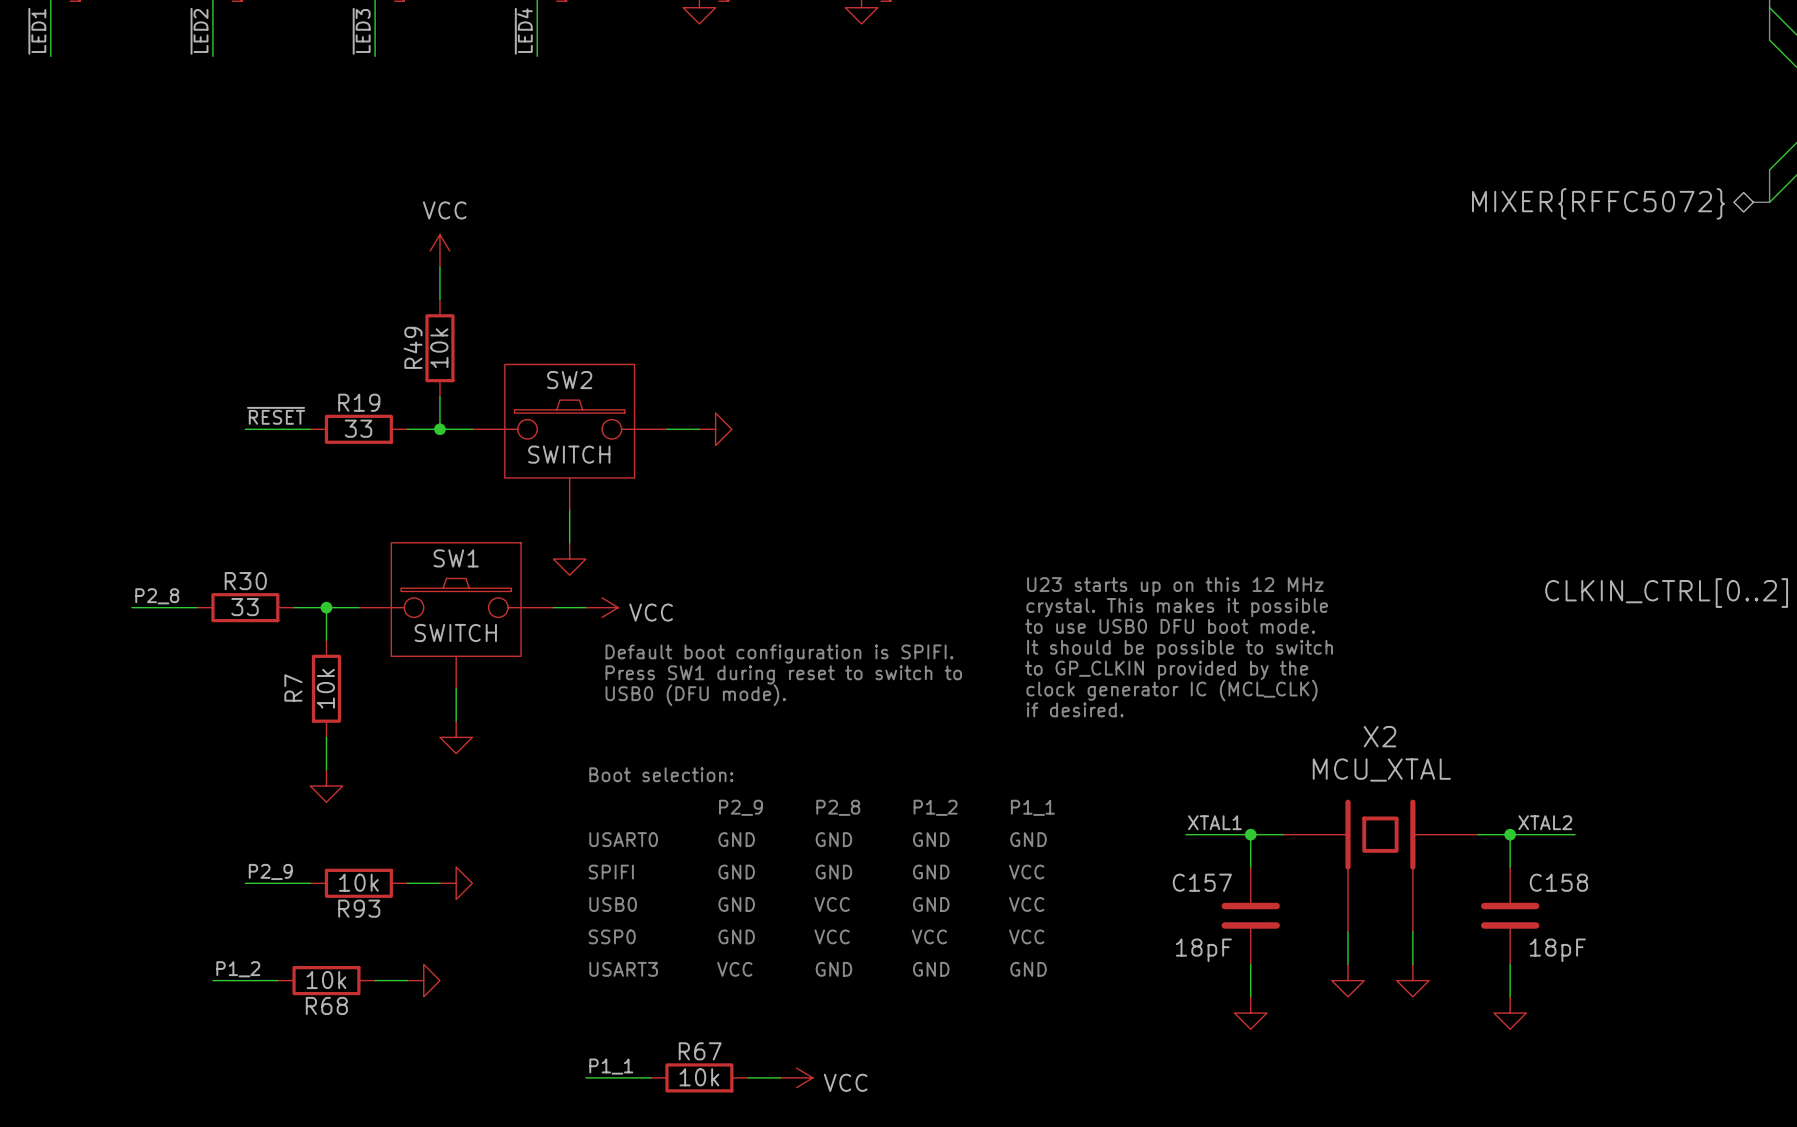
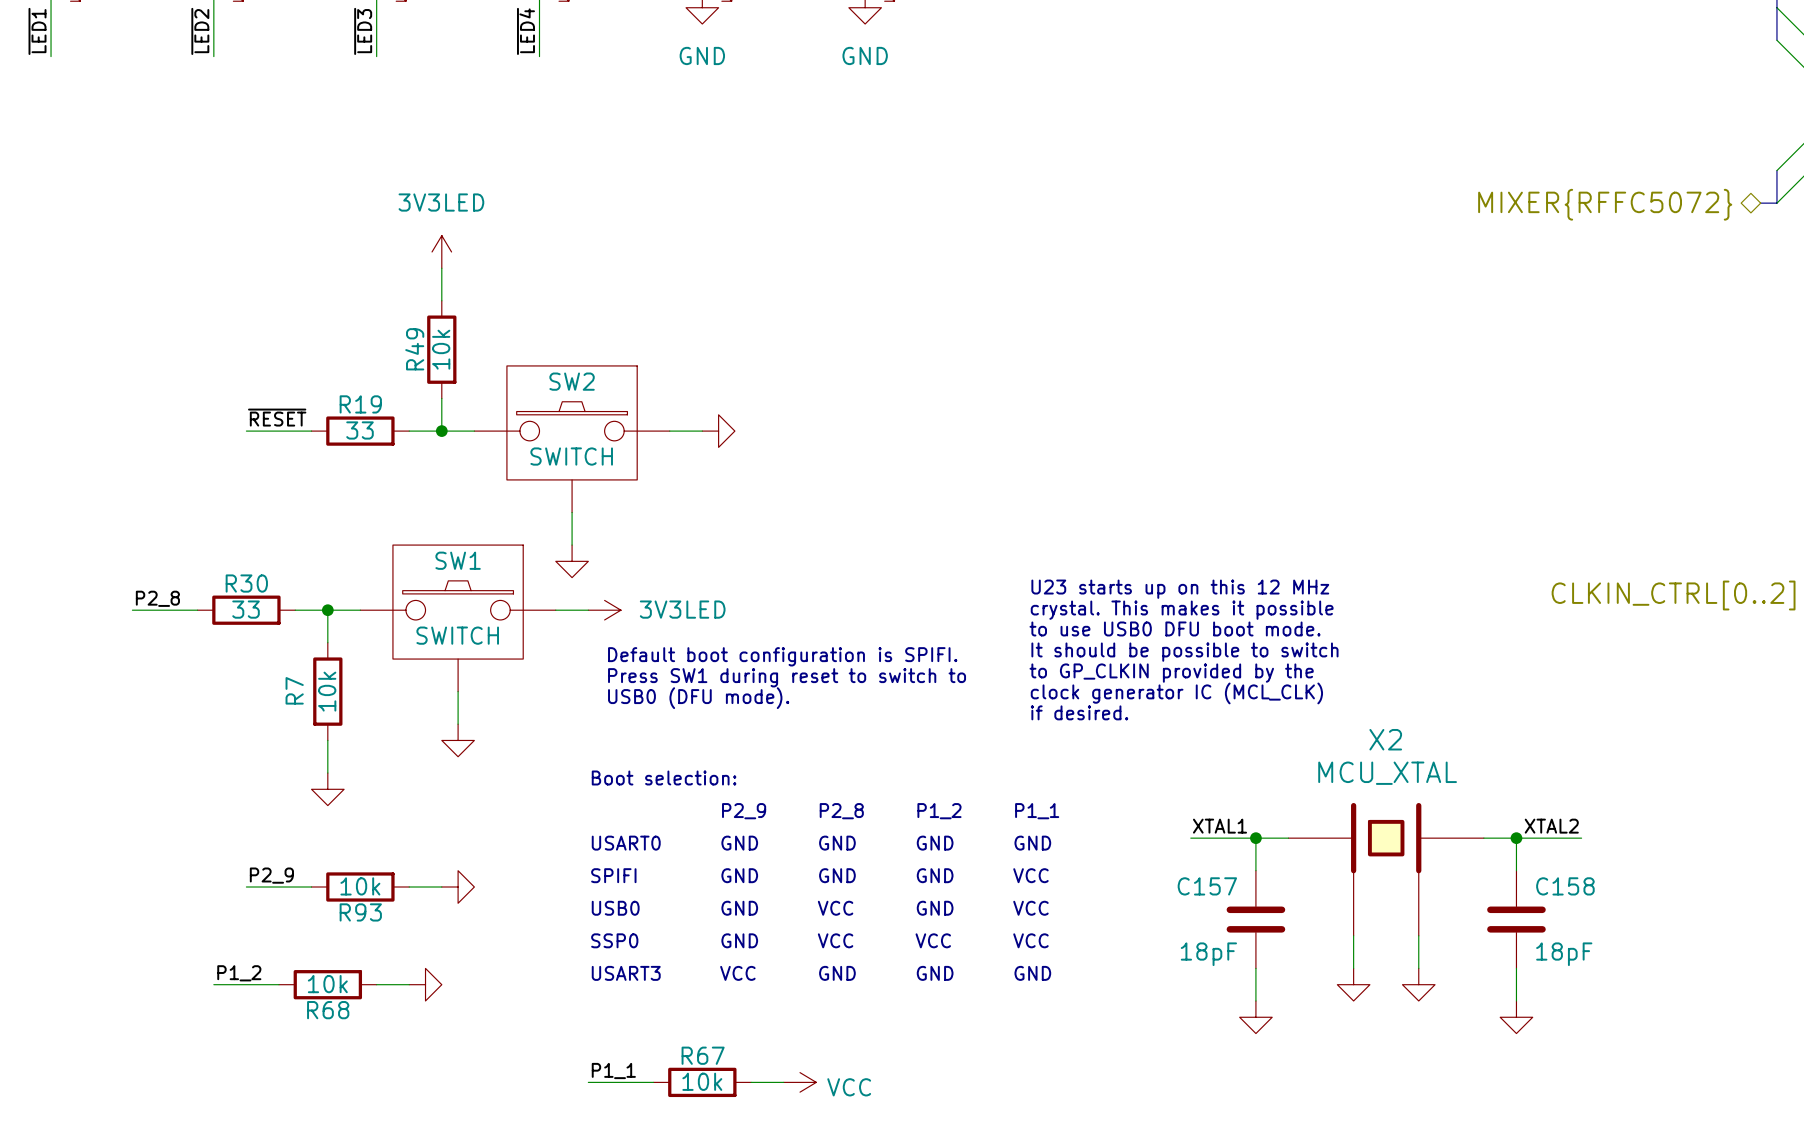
power symbol text: none -> GND (702, 55)
power symbol text: none -> GND (865, 55)
power symbol: VCC (439, 250) -> 3V3LED (441, 251)
power symbol: VCC (602, 607) -> 3V3LED (604, 610)

